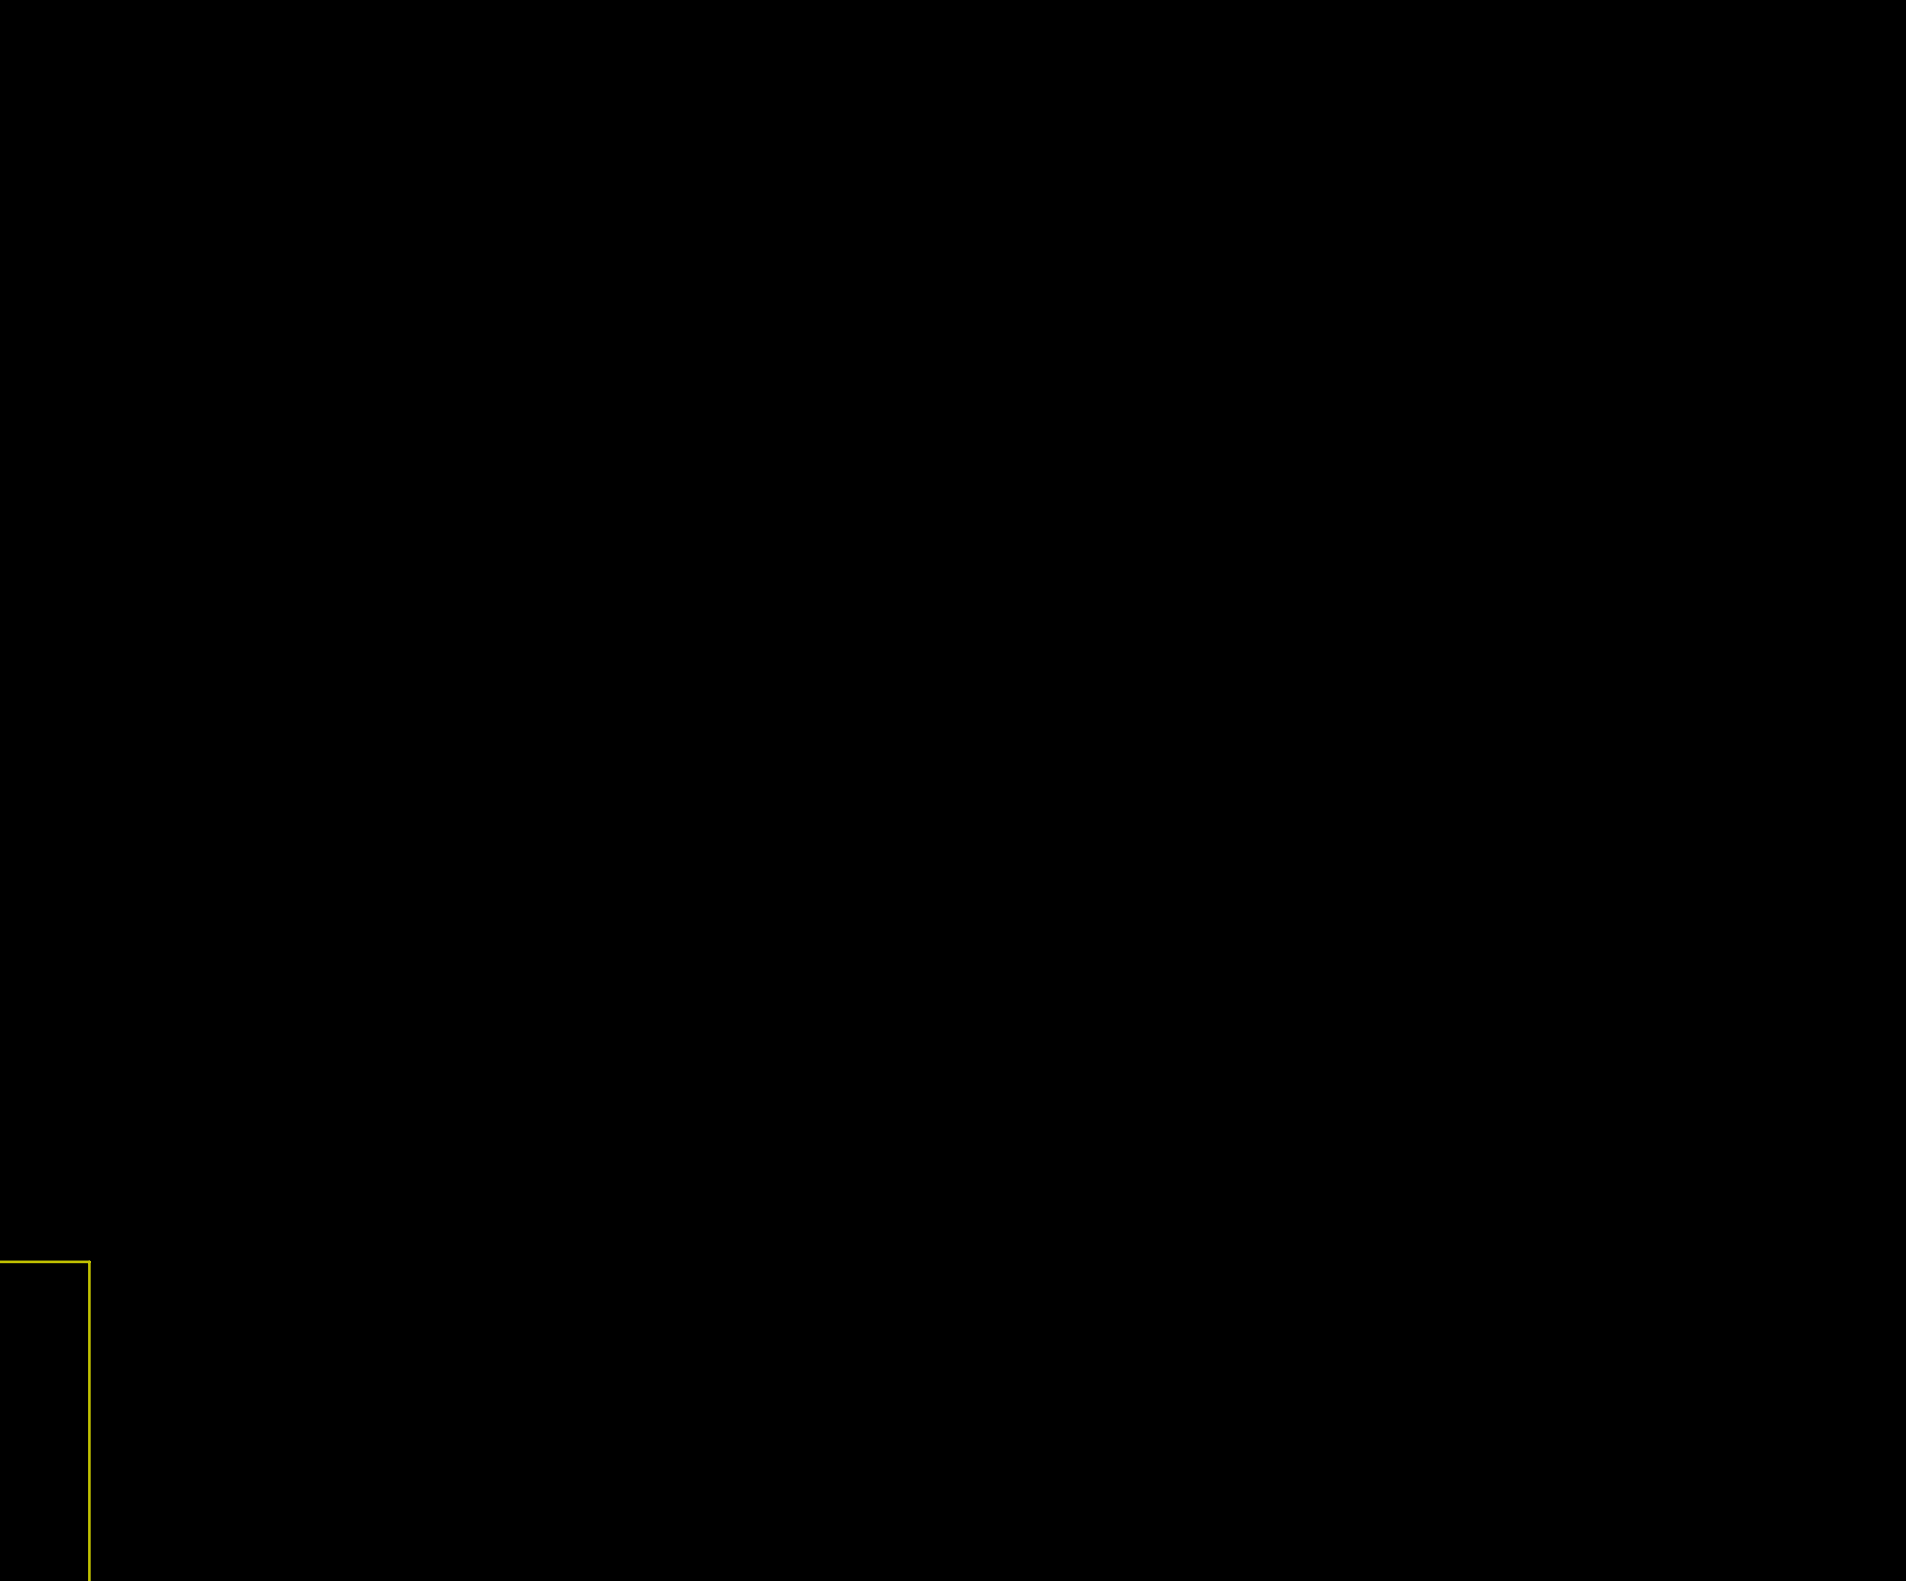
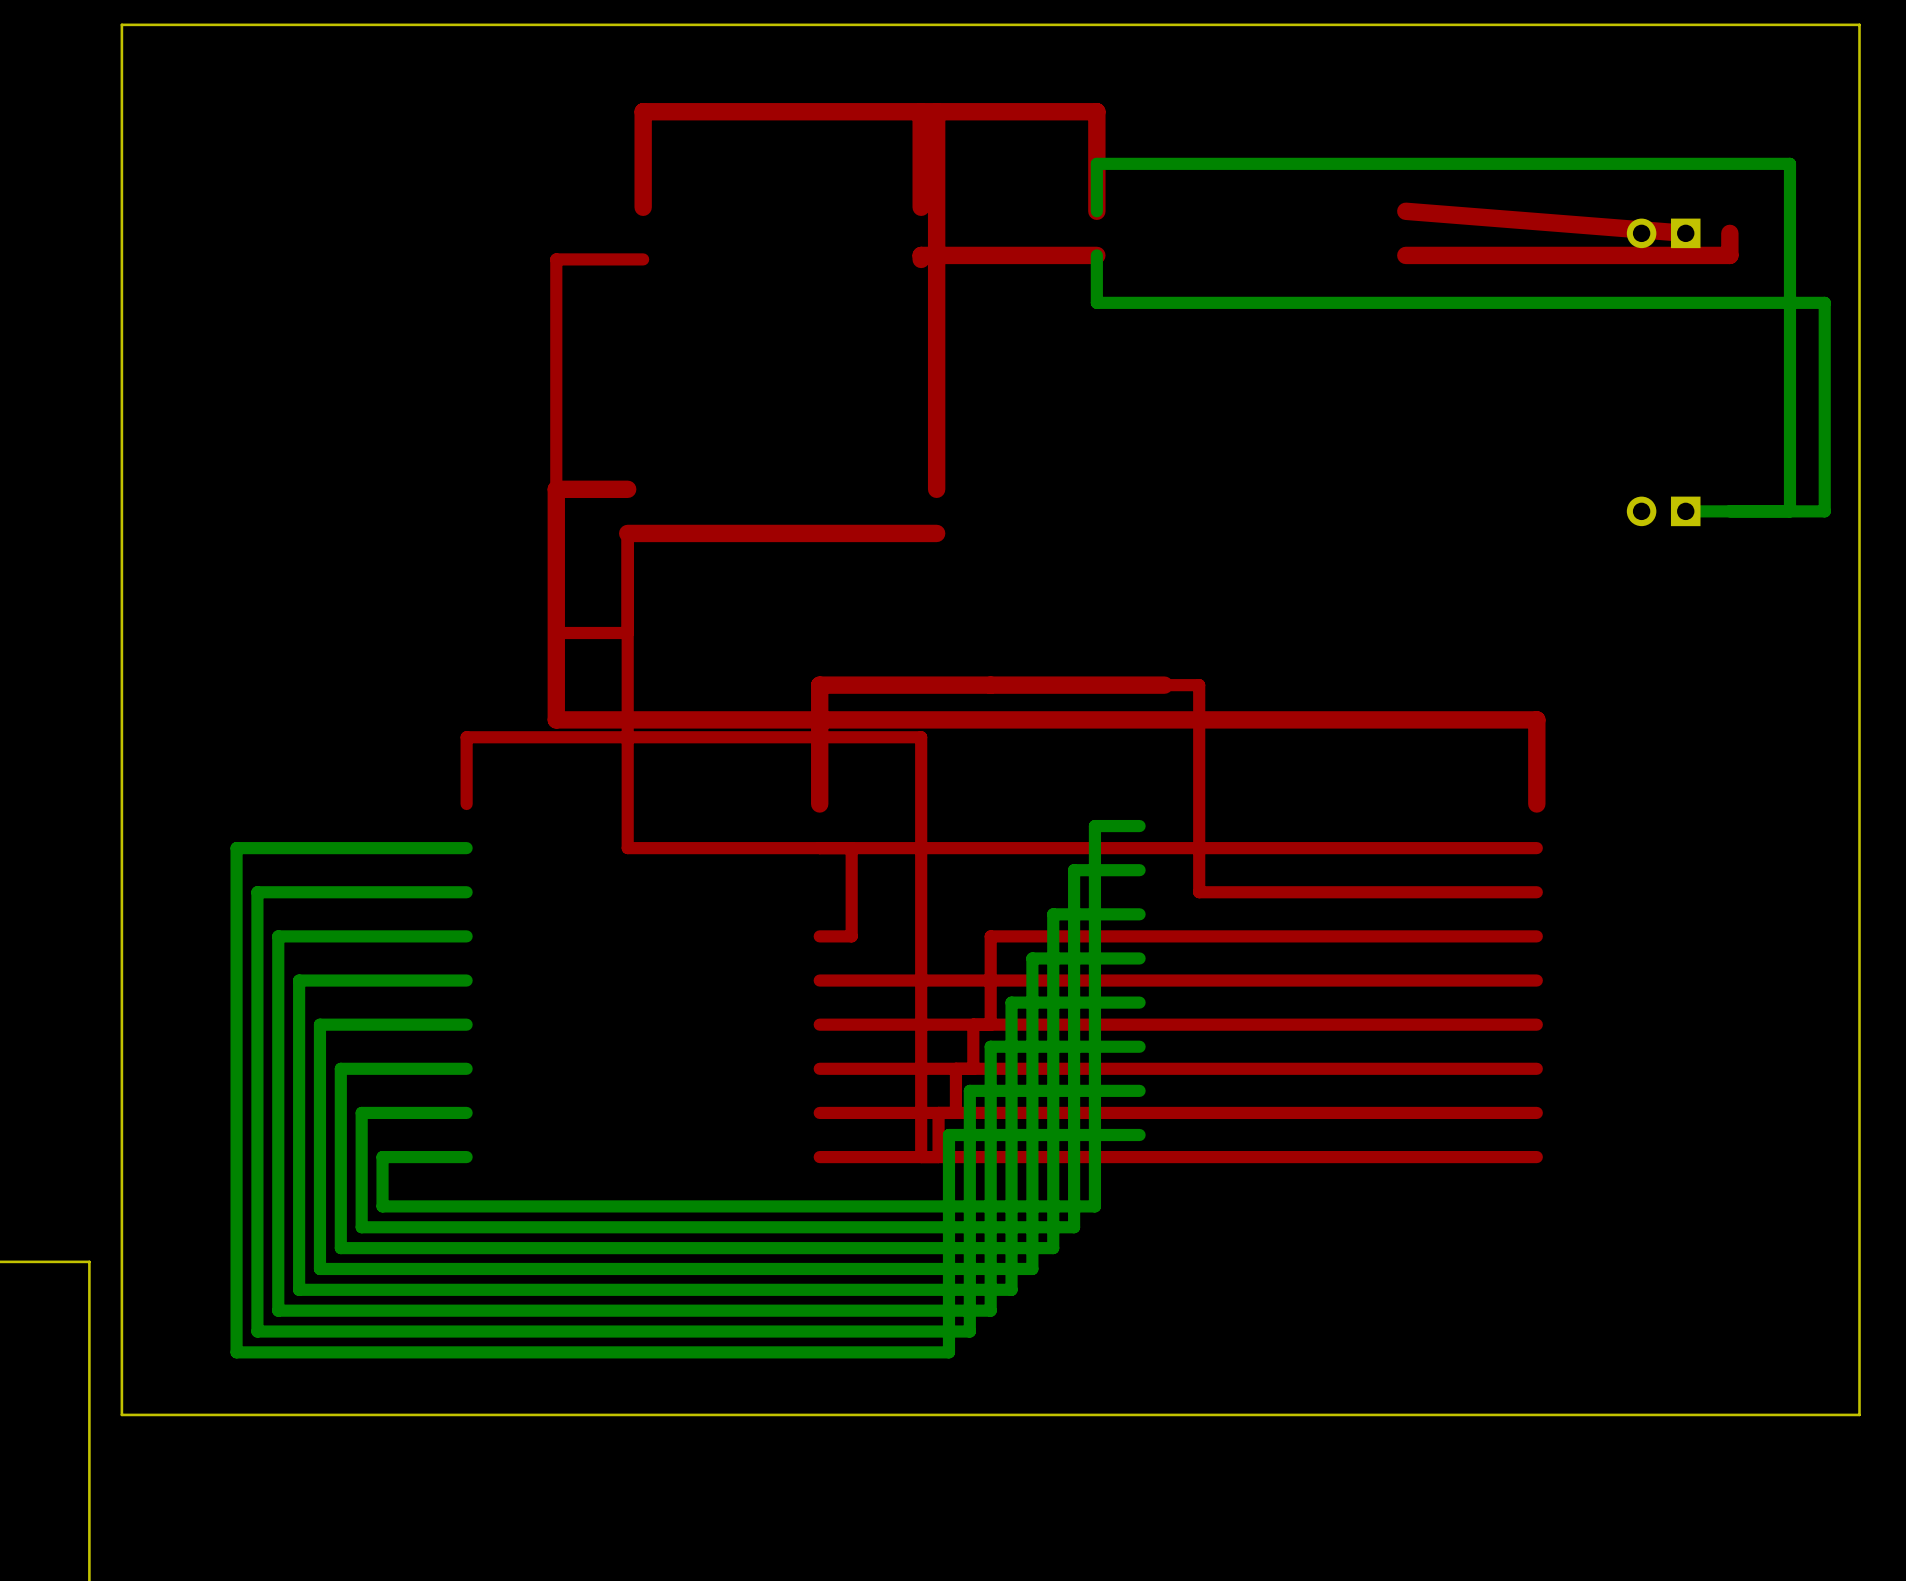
board edge: none -> (1859, 24) (121, 24) (121, 1414) (1859, 1414) (1859, 24)
top track: none -> (921, 111) (921, 207)
top track: none -> (936, 111) (936, 489)
top track: none -> (643, 207) (643, 111) (1096, 111) (1096, 211)
bottom track: none -> (1096, 211) (1096, 163) (1789, 163) (1789, 511)
top track: none -> (1405, 211) (1685, 233)
part: none -> (1663, 233)
top track: none -> (1729, 233) (1729, 255) (1405, 255)
top track: none -> (1096, 255) (921, 255) (921, 259)
bottom track: none -> (1096, 255) (1096, 302) (1824, 302) (1824, 511) (1685, 511)
top track: none -> (643, 259) (556, 259) (556, 633) (627, 633)
top track: none -> (627, 489) (556, 489) (556, 719) (1536, 719) (1536, 803)
part: none -> (1663, 511)
top track: none -> (936, 533) (627, 533) (627, 848) (1536, 848)
top track: none -> (466, 803) (466, 737) (921, 737) (921, 1157)
top track: none -> (819, 803) (819, 685) (1199, 685) (1199, 892) (1536, 892)
bottom track: none -> (1139, 826) (1094, 826) (1094, 1206) (382, 1206) (382, 1157) (466, 1157)
bottom track: none -> (466, 848) (236, 848) (236, 1352) (948, 1352) (948, 1135) (1139, 1135)
top track: none -> (851, 848) (851, 936) (819, 936)
bottom track: none -> (1139, 870) (1074, 870) (1074, 1227) (361, 1227) (361, 1112) (466, 1112)
bottom track: none -> (466, 892) (257, 892) (257, 1331) (969, 1331) (969, 1090) (1139, 1090)
bottom track: none -> (1139, 914) (1053, 914) (1053, 1248) (340, 1248) (340, 1068) (466, 1068)
bottom track: none -> (466, 936) (278, 936) (278, 1310) (990, 1310) (990, 1046) (1139, 1046)
top track: none -> (1536, 936) (990, 936) (990, 1024)
bottom track: none -> (1139, 958) (1032, 958) (1032, 1268) (319, 1268) (319, 1024) (466, 1024)
bottom track: none -> (466, 980) (299, 980) (299, 1289) (1011, 1289) (1011, 1002) (1139, 1002)
top track: none -> (1536, 980) (819, 980)
top track: none -> (973, 1024) (973, 1068)
top track: none -> (1536, 1024) (819, 1024)
top track: none -> (955, 1068) (955, 1112)
top track: none -> (1536, 1068) (819, 1068)
top track: none -> (938, 1112) (938, 1157)
top track: none -> (1536, 1112) (819, 1112)
top track: none -> (1536, 1157) (819, 1157)

